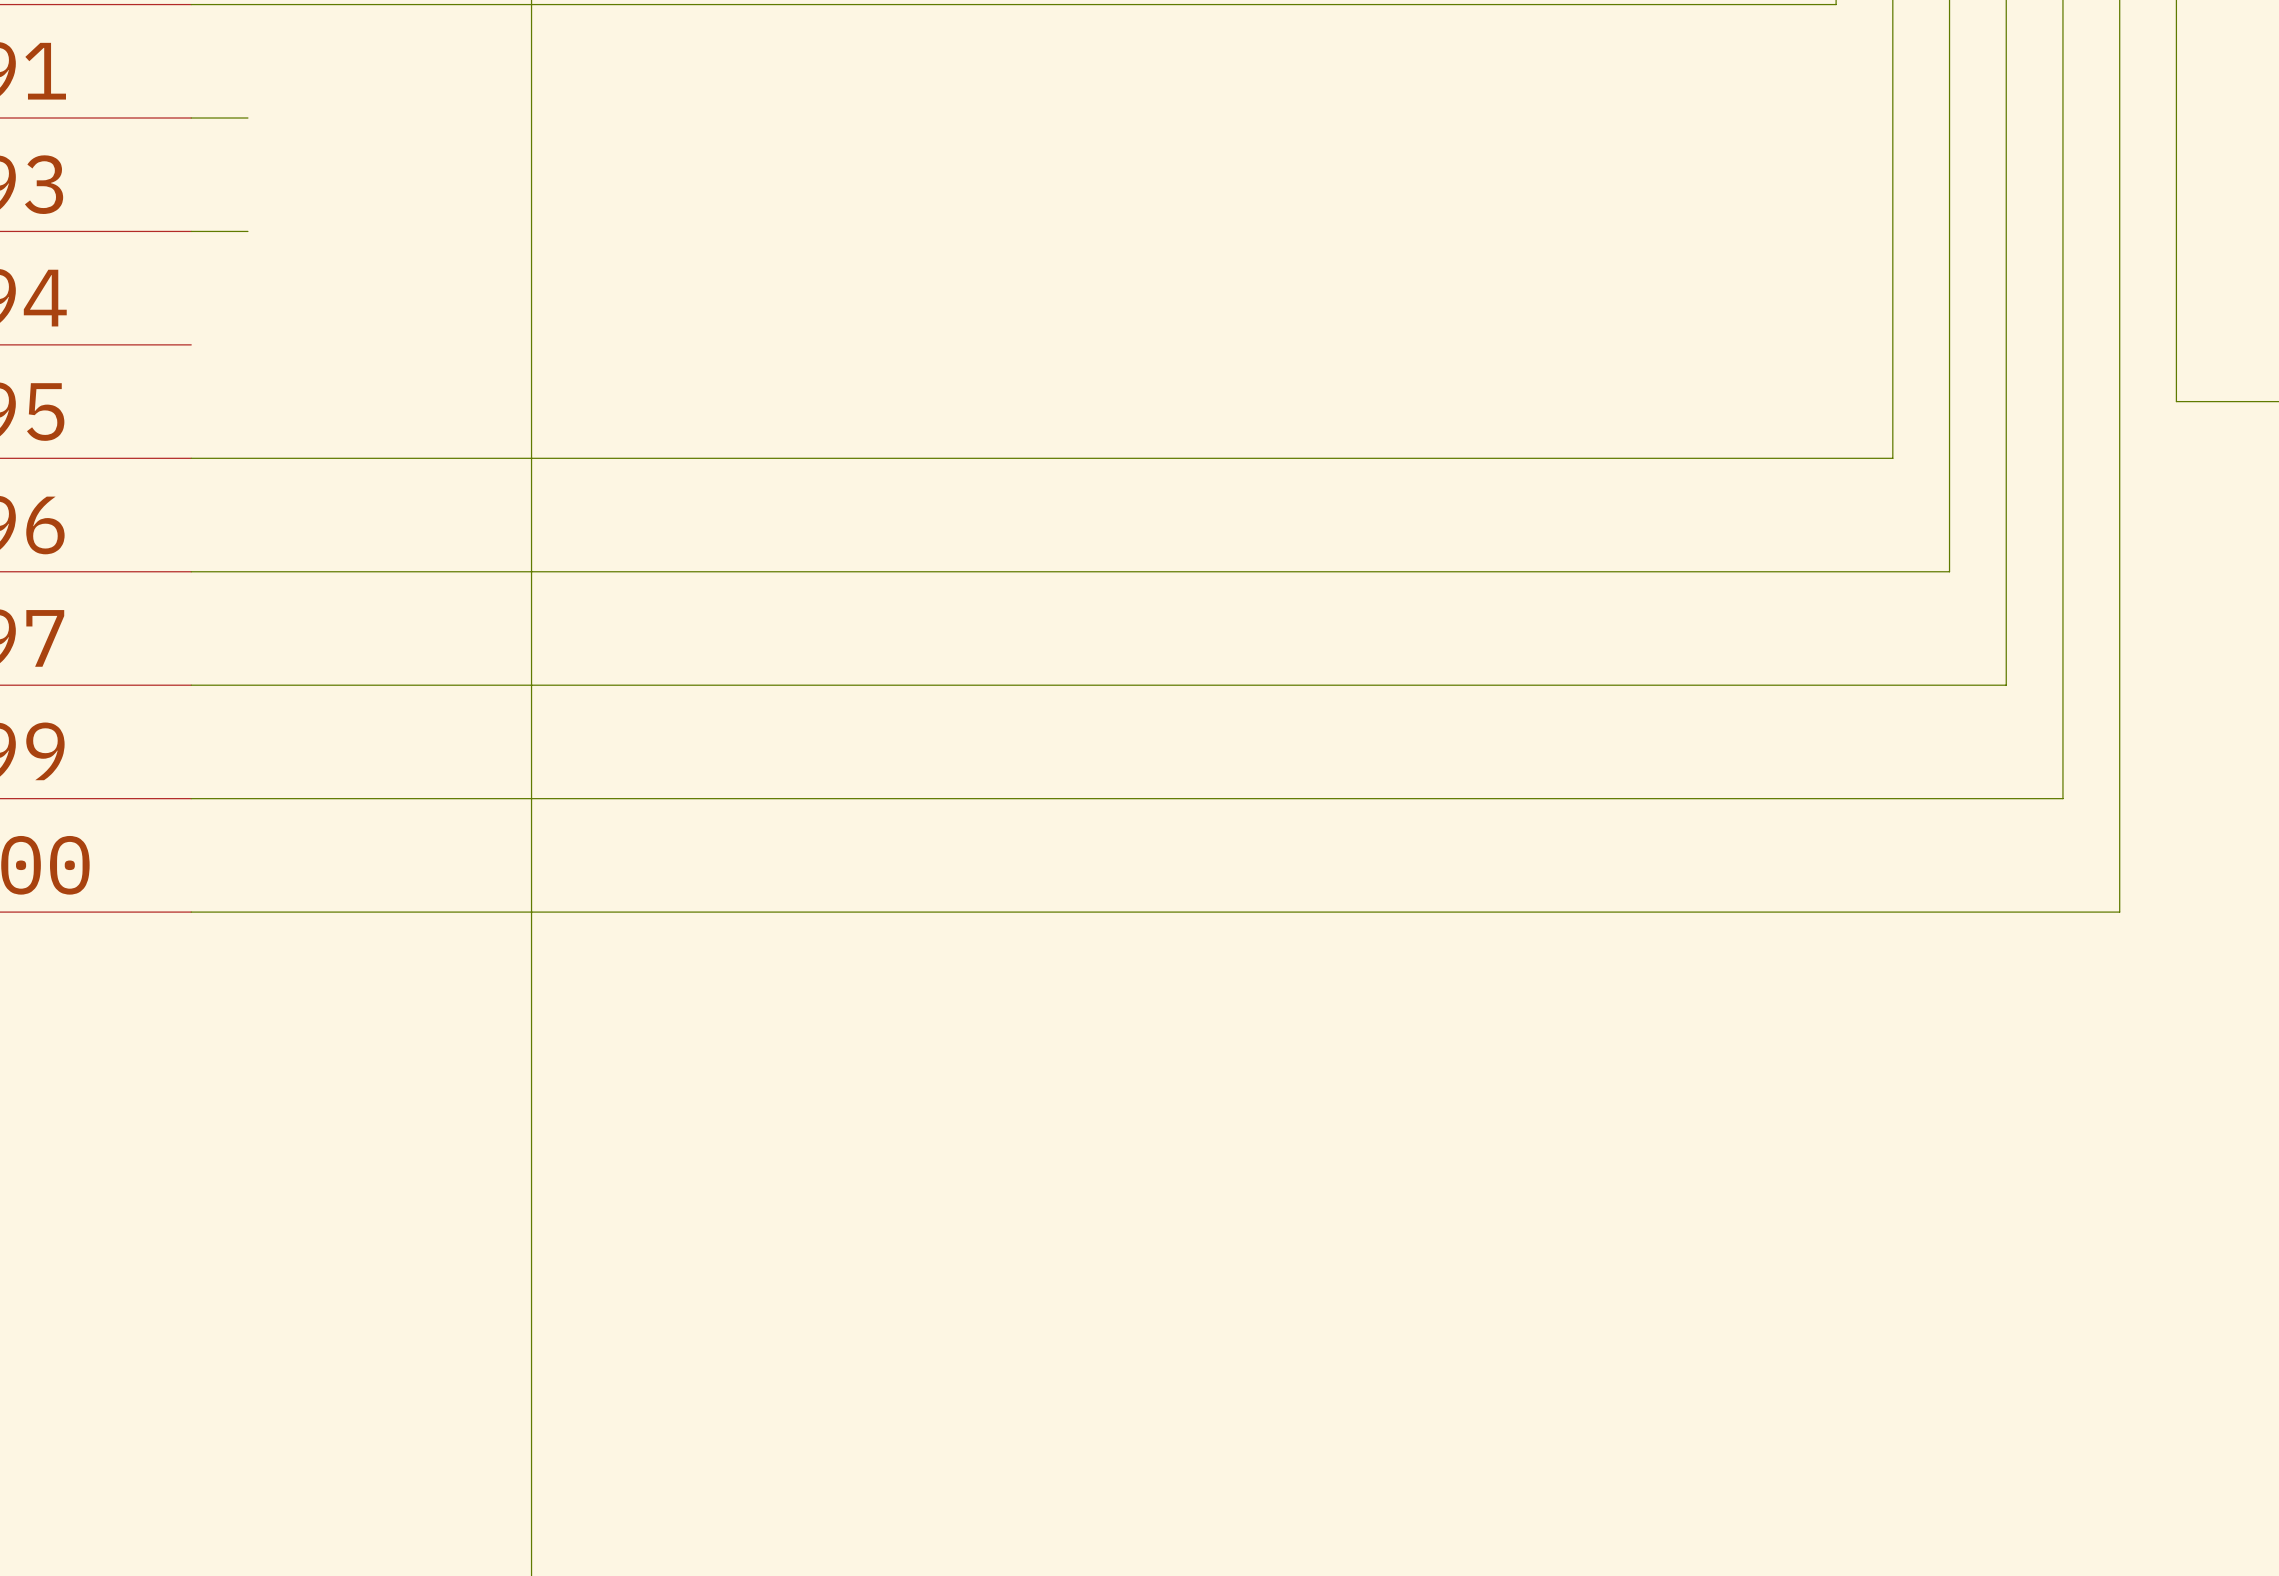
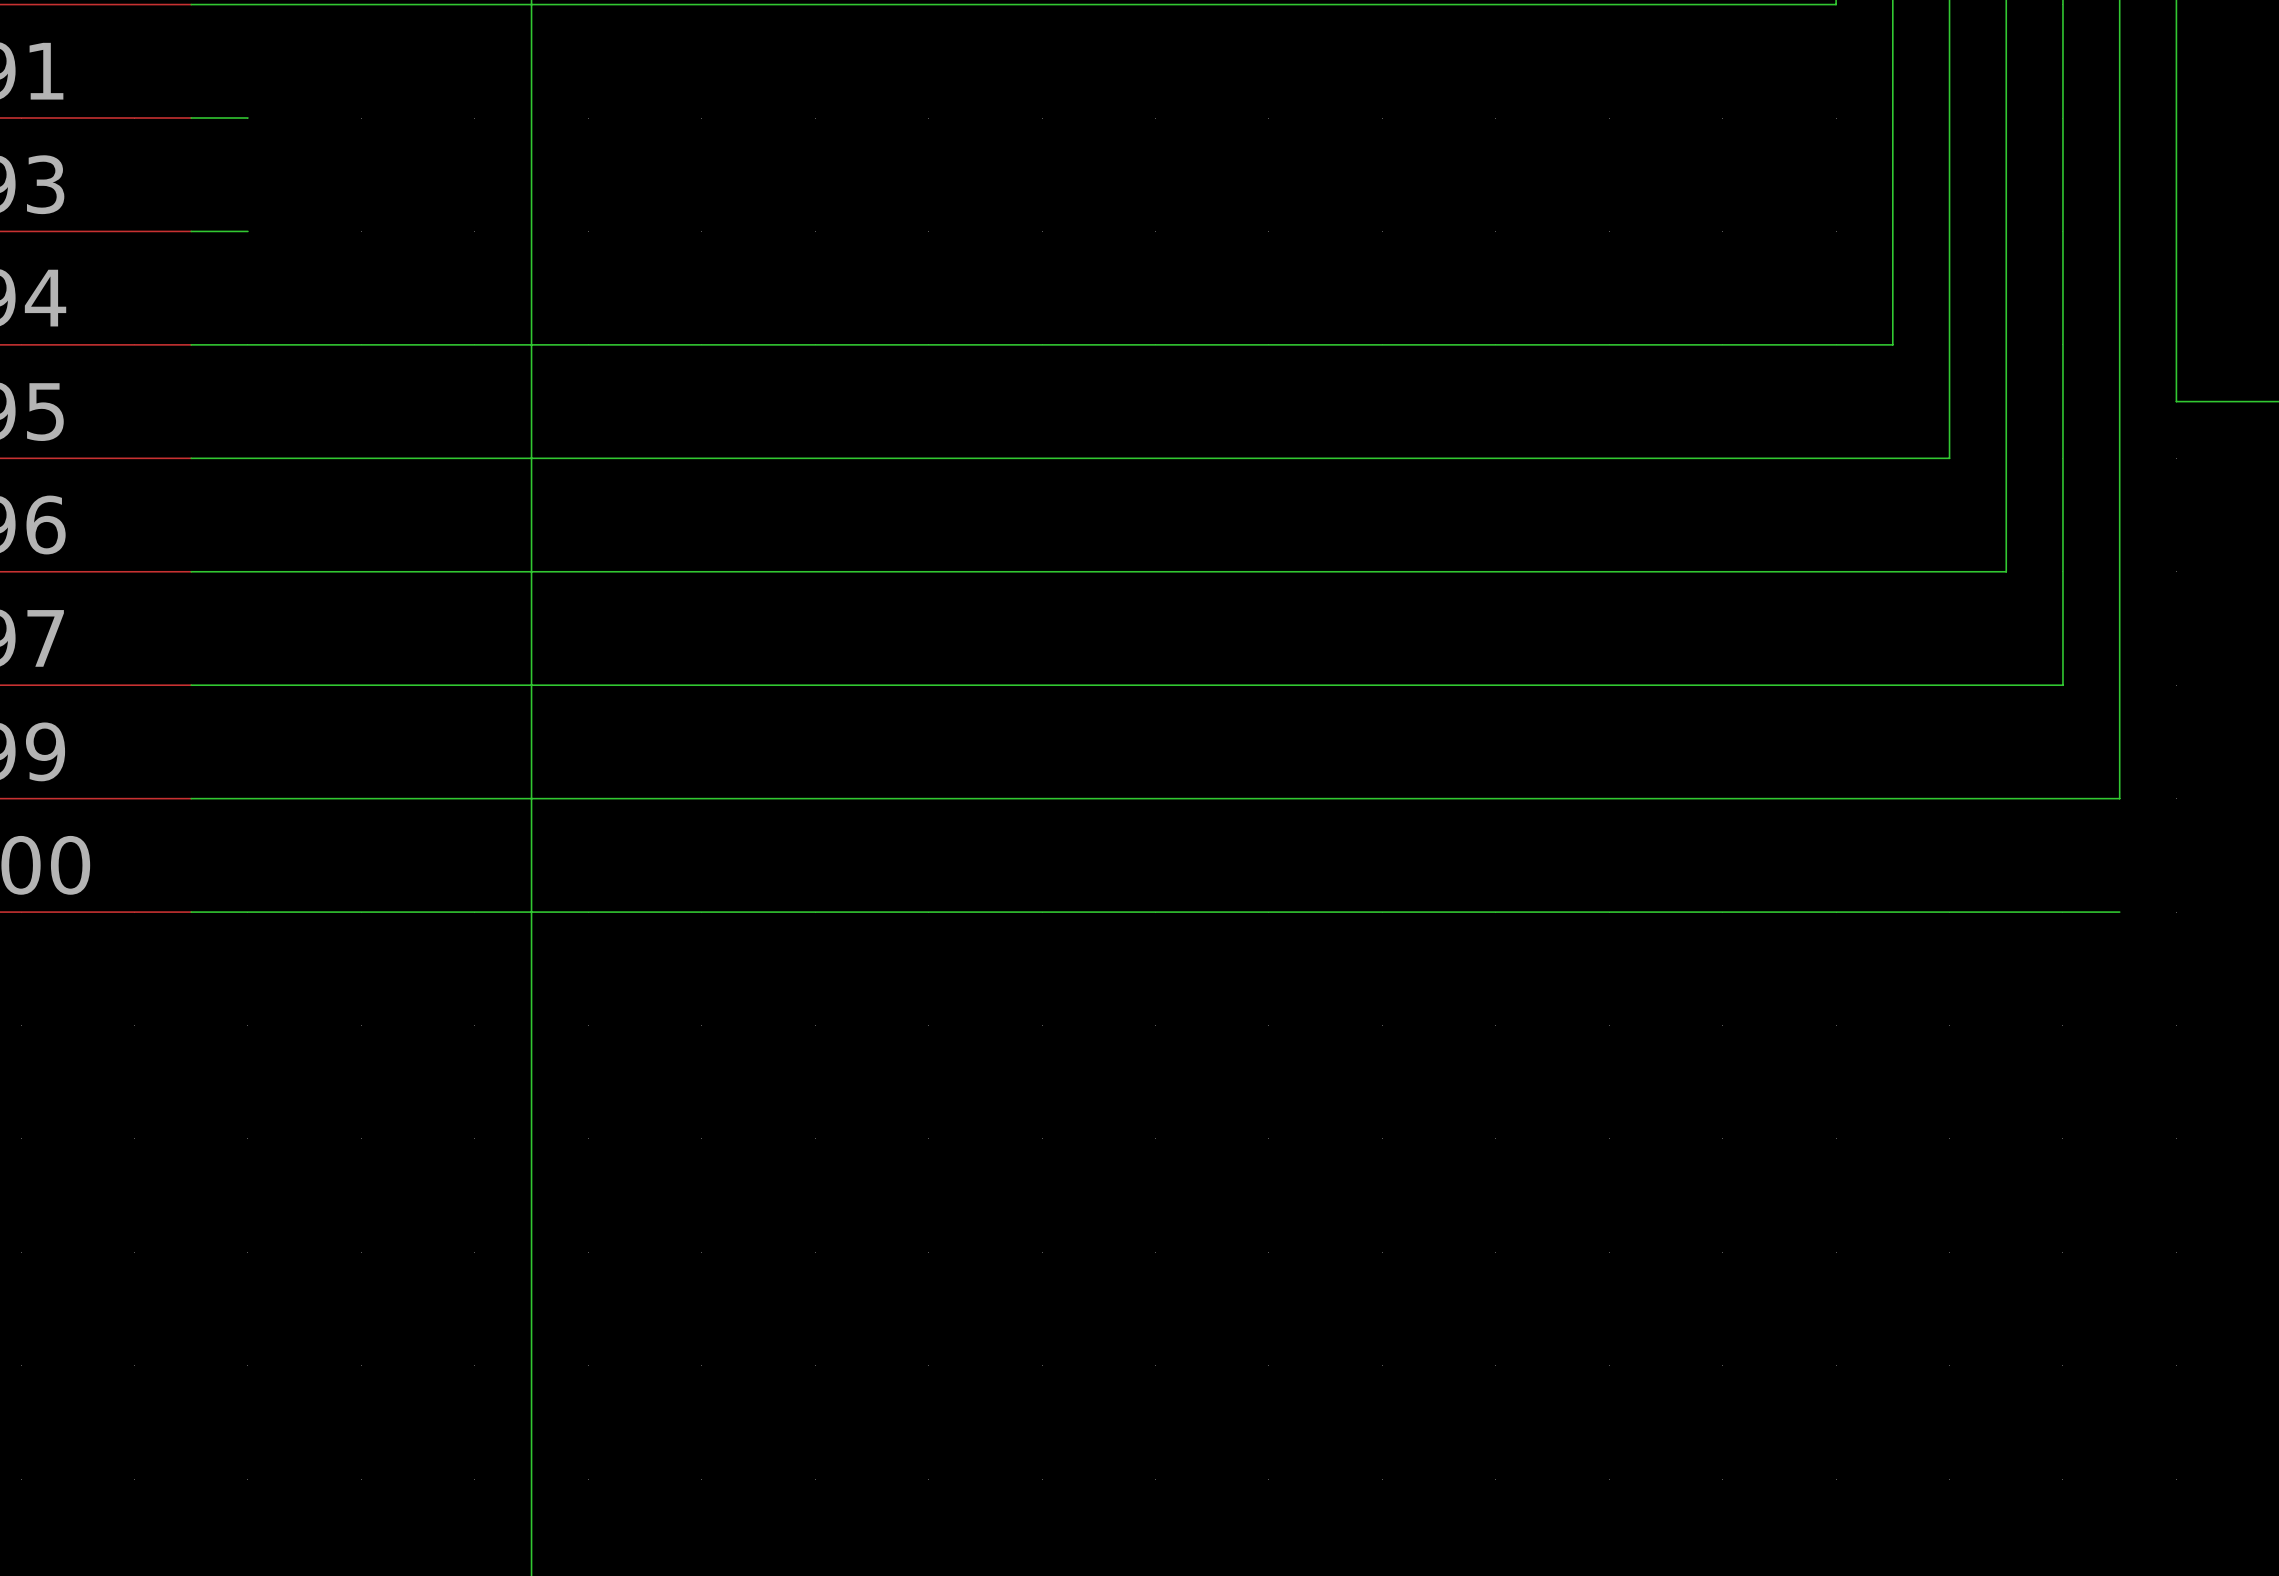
wire: (1892, 344) (1892, 458) -> (1892, 344) (191, 344)
wire: (1949, 458) (1949, 571) -> (1949, 458) (1892, 458)
wire: none -> (1949, 571) (2006, 571)
wire: (2006, 571) (2006, 685) -> (2062, 685) (2006, 685)
wire: (2062, 685) (2062, 798) -> none
wire: (2119, 798) (2119, 912) -> (2119, 798) (2062, 798)

